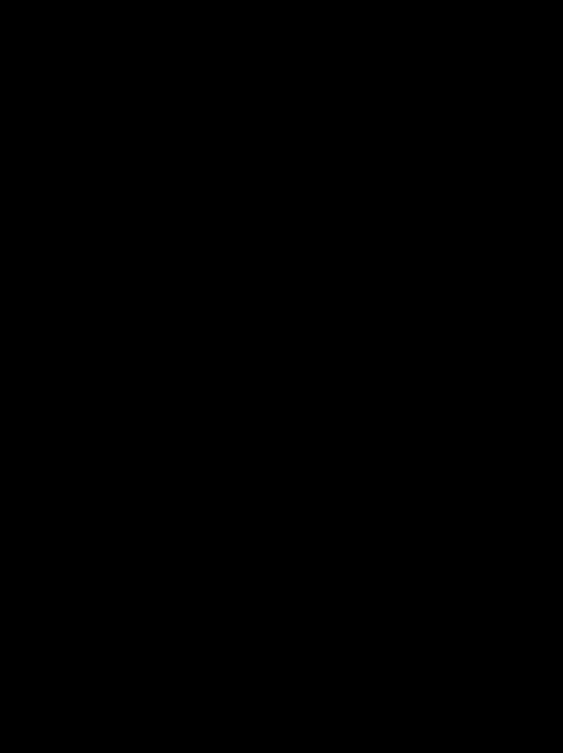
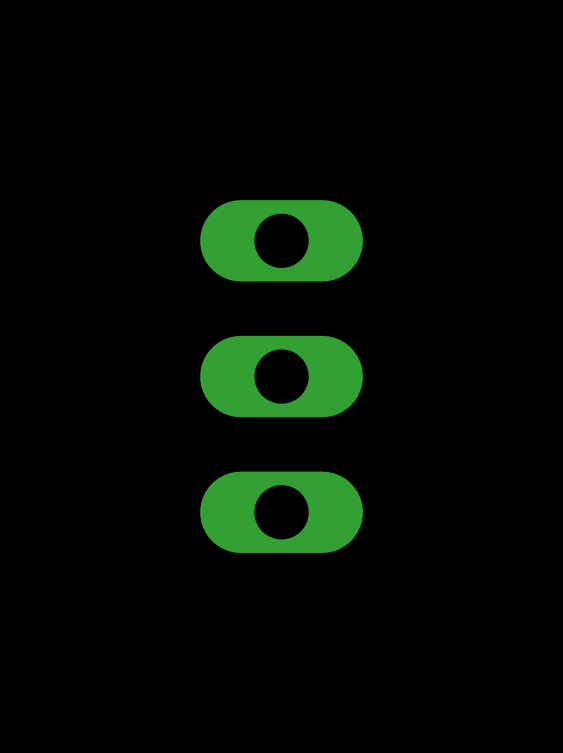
part: none -> (281, 376)

